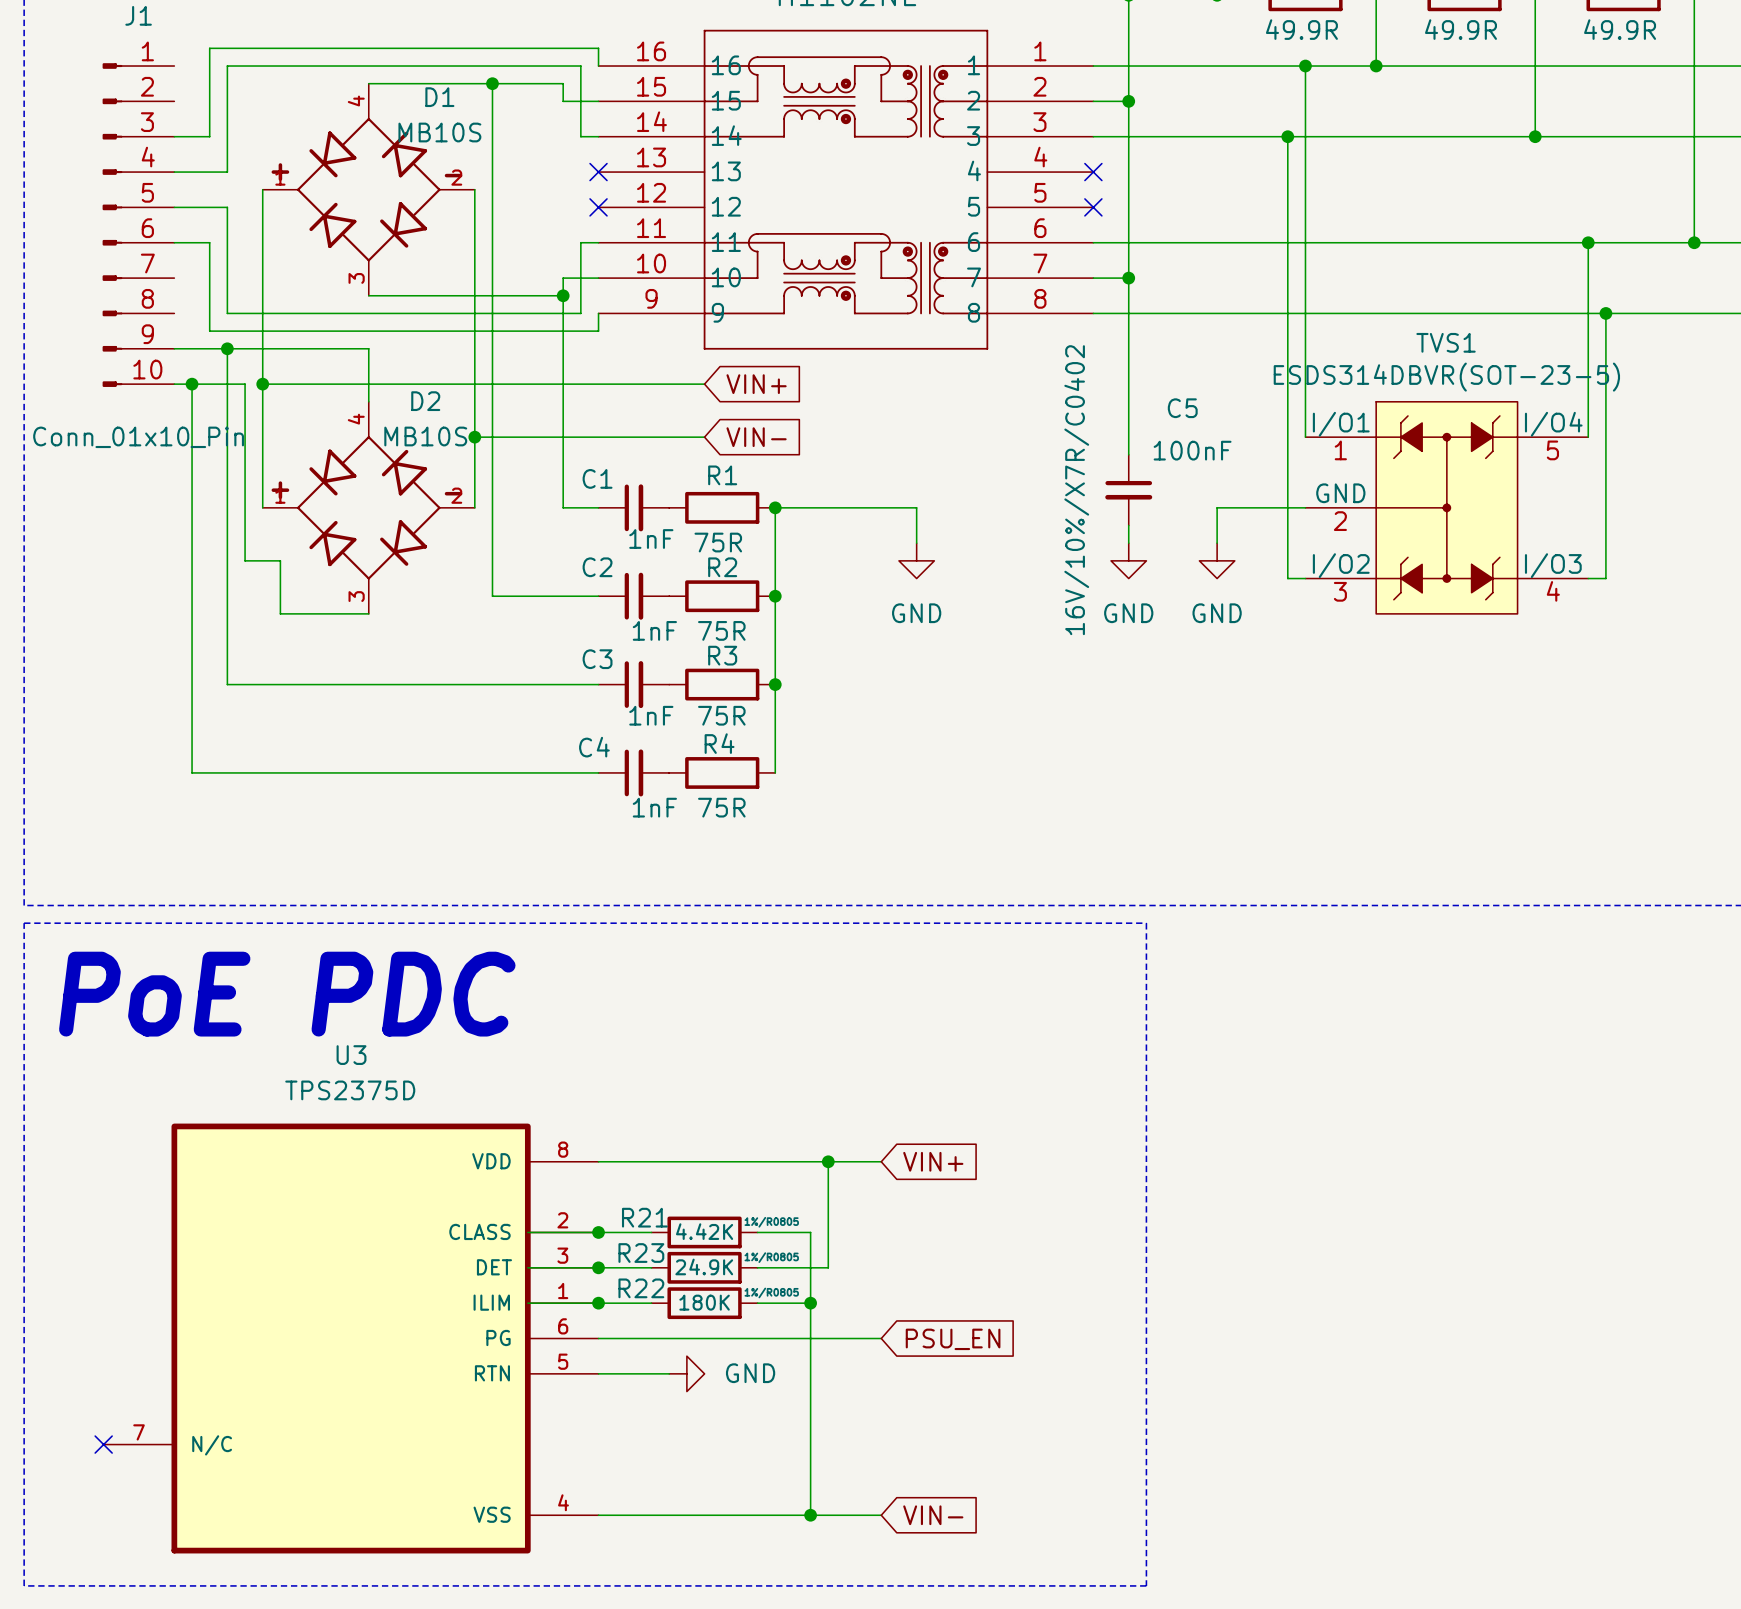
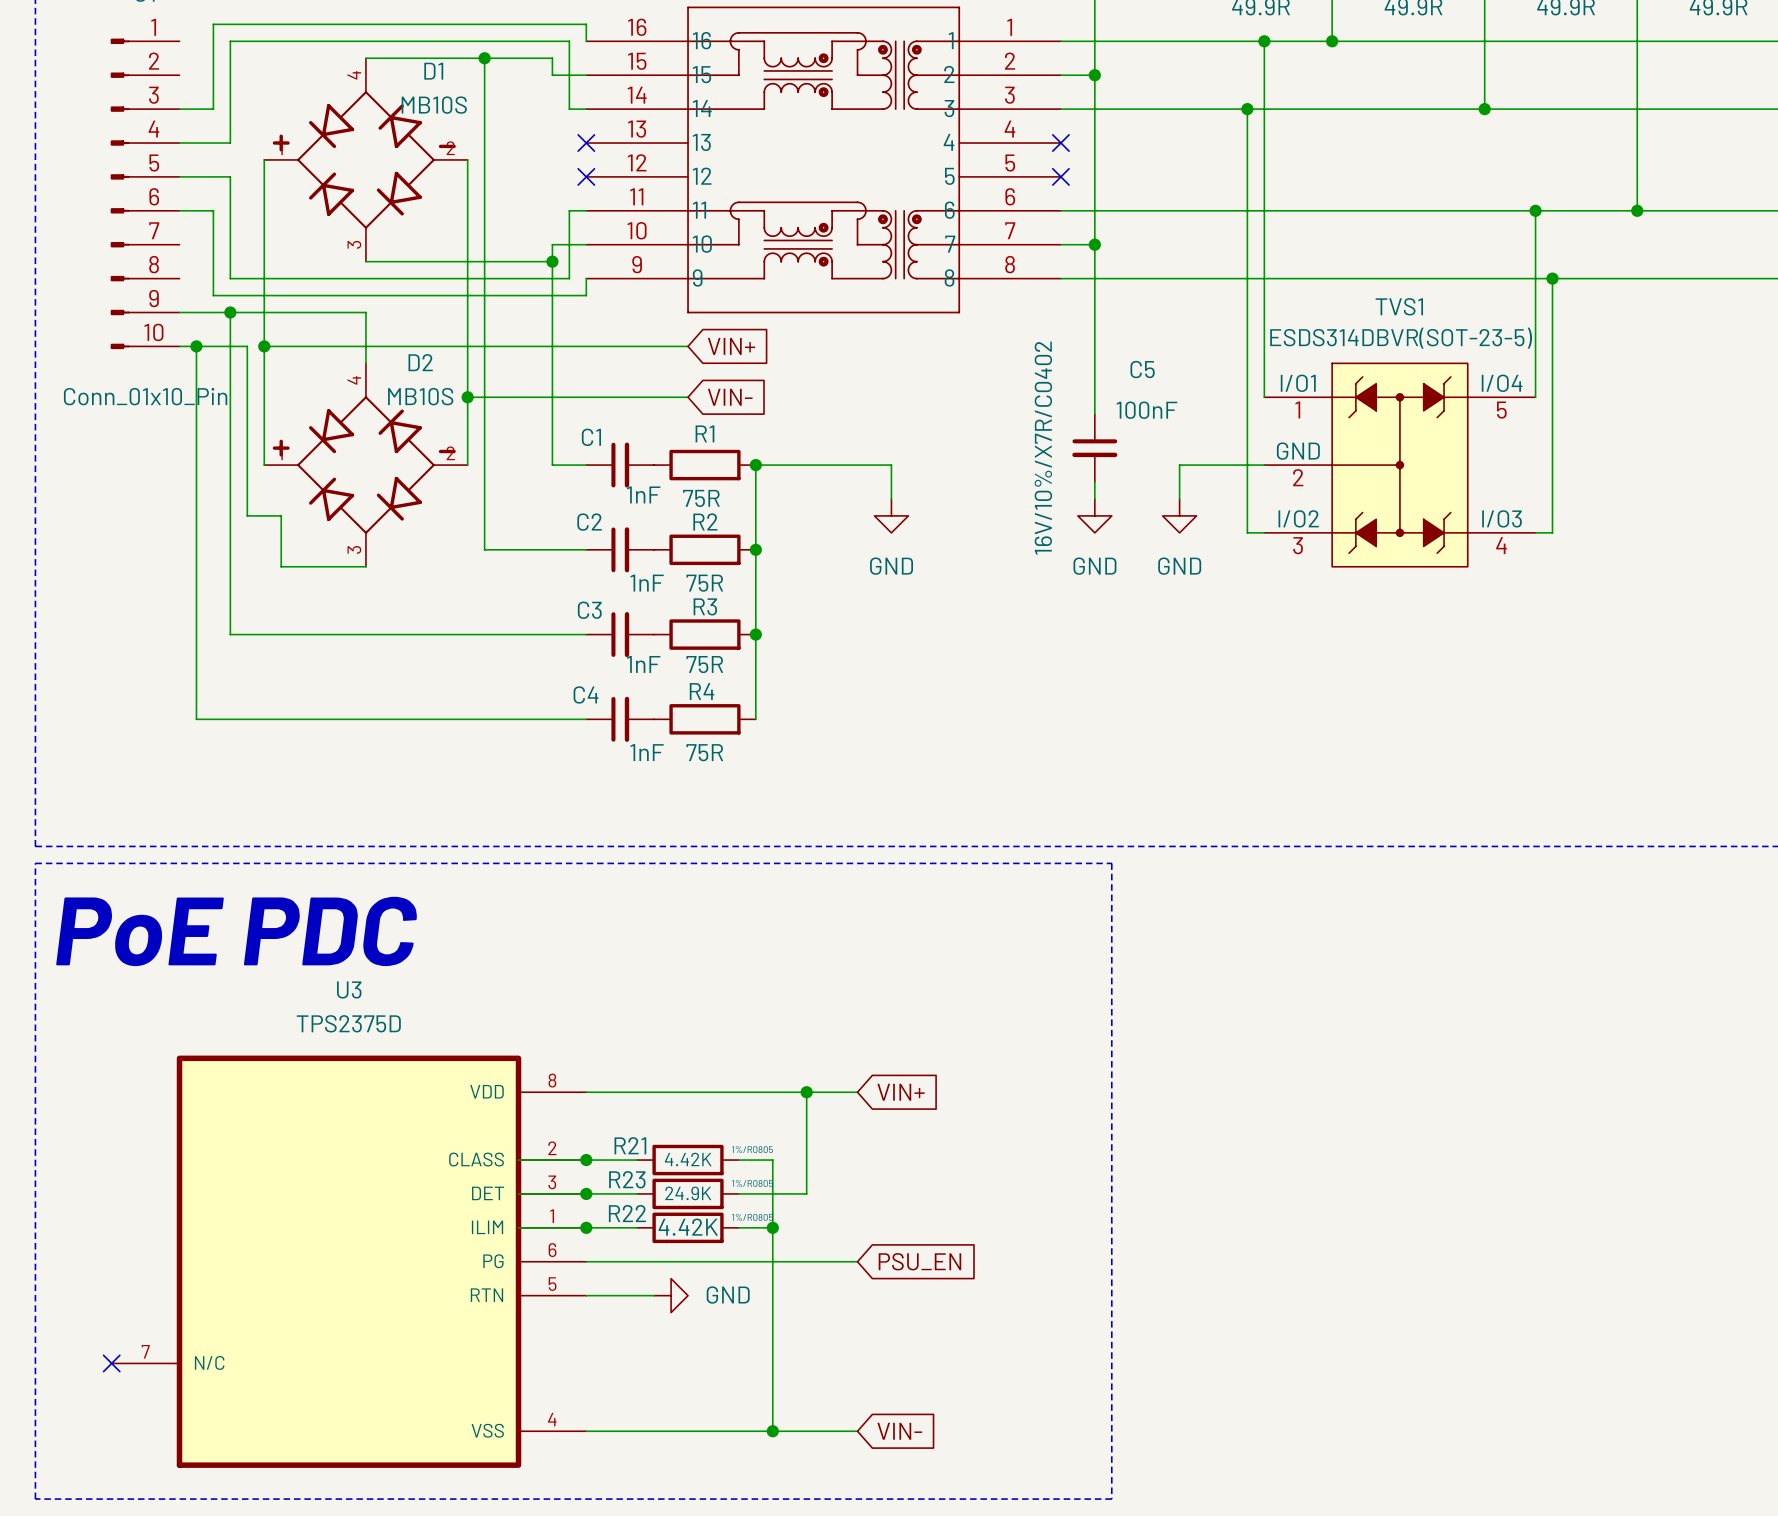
wire: (792, 1232) (810, 1232) (810, 1515) -> (772, 1160) (772, 1431)
R22 value: 180K (704, 1302) -> 4.42K (688, 1227)
wire: (792, 1303) (810, 1303) -> none
junction position: (810, 1303) -> (772, 1227)
junction position: (810, 1515) -> (772, 1431)

